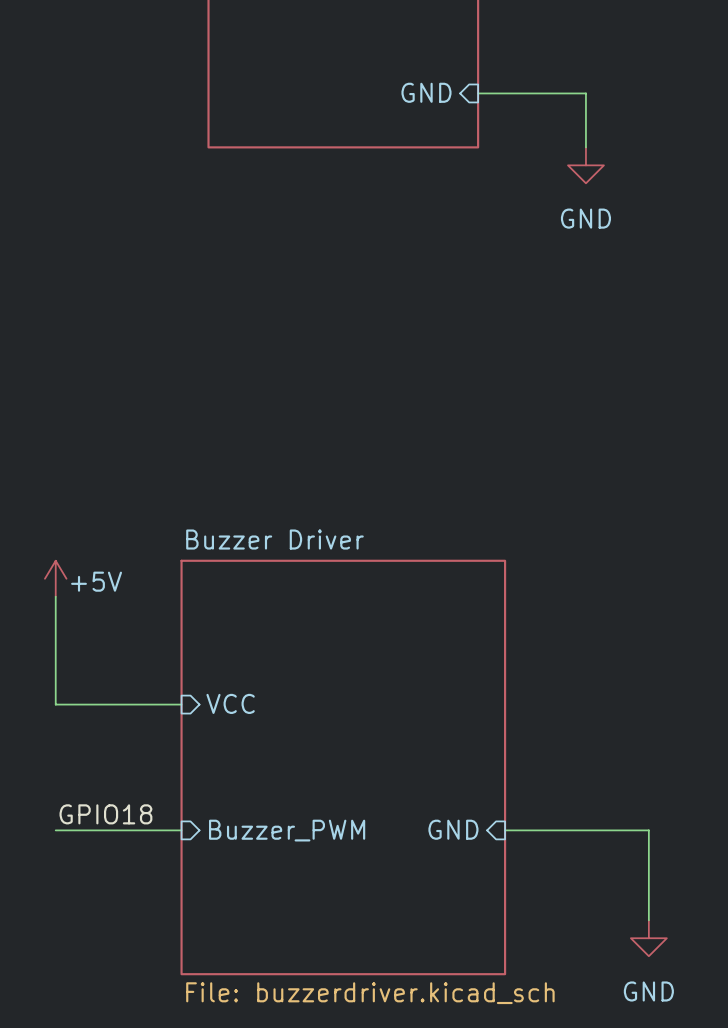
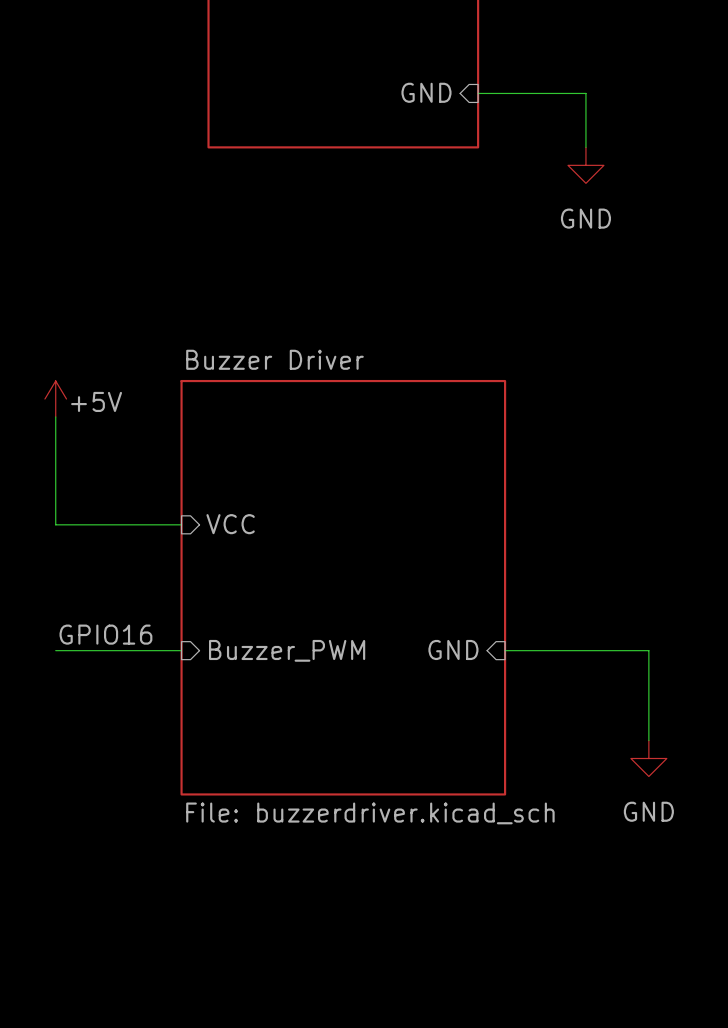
power symbol position: +5V (55, 578) -> +5V (55, 399)
wire: (55, 596) (55, 704) (181, 704) -> (55, 416) (55, 524) (181, 524)
label: none -> GPIO16 (105, 634)
sheet pin position: VCC (230, 703) -> VCC (230, 524)
sheet Buzzer Driver position: (343, 767) -> (343, 587)
label: GPIO18 (105, 814) -> none
sheet pin position: GND (453, 829) -> GND (453, 649)
wire: (55, 830) (181, 830) -> (55, 650) (181, 650)
sheet pin position: Buzzer_PWM (287, 830) -> Buzzer_PWM (287, 650)
wire: (505, 830) (648, 830) (648, 920) -> (505, 650) (648, 650) (648, 740)
power symbol position: GND (648, 938) -> GND (648, 758)

